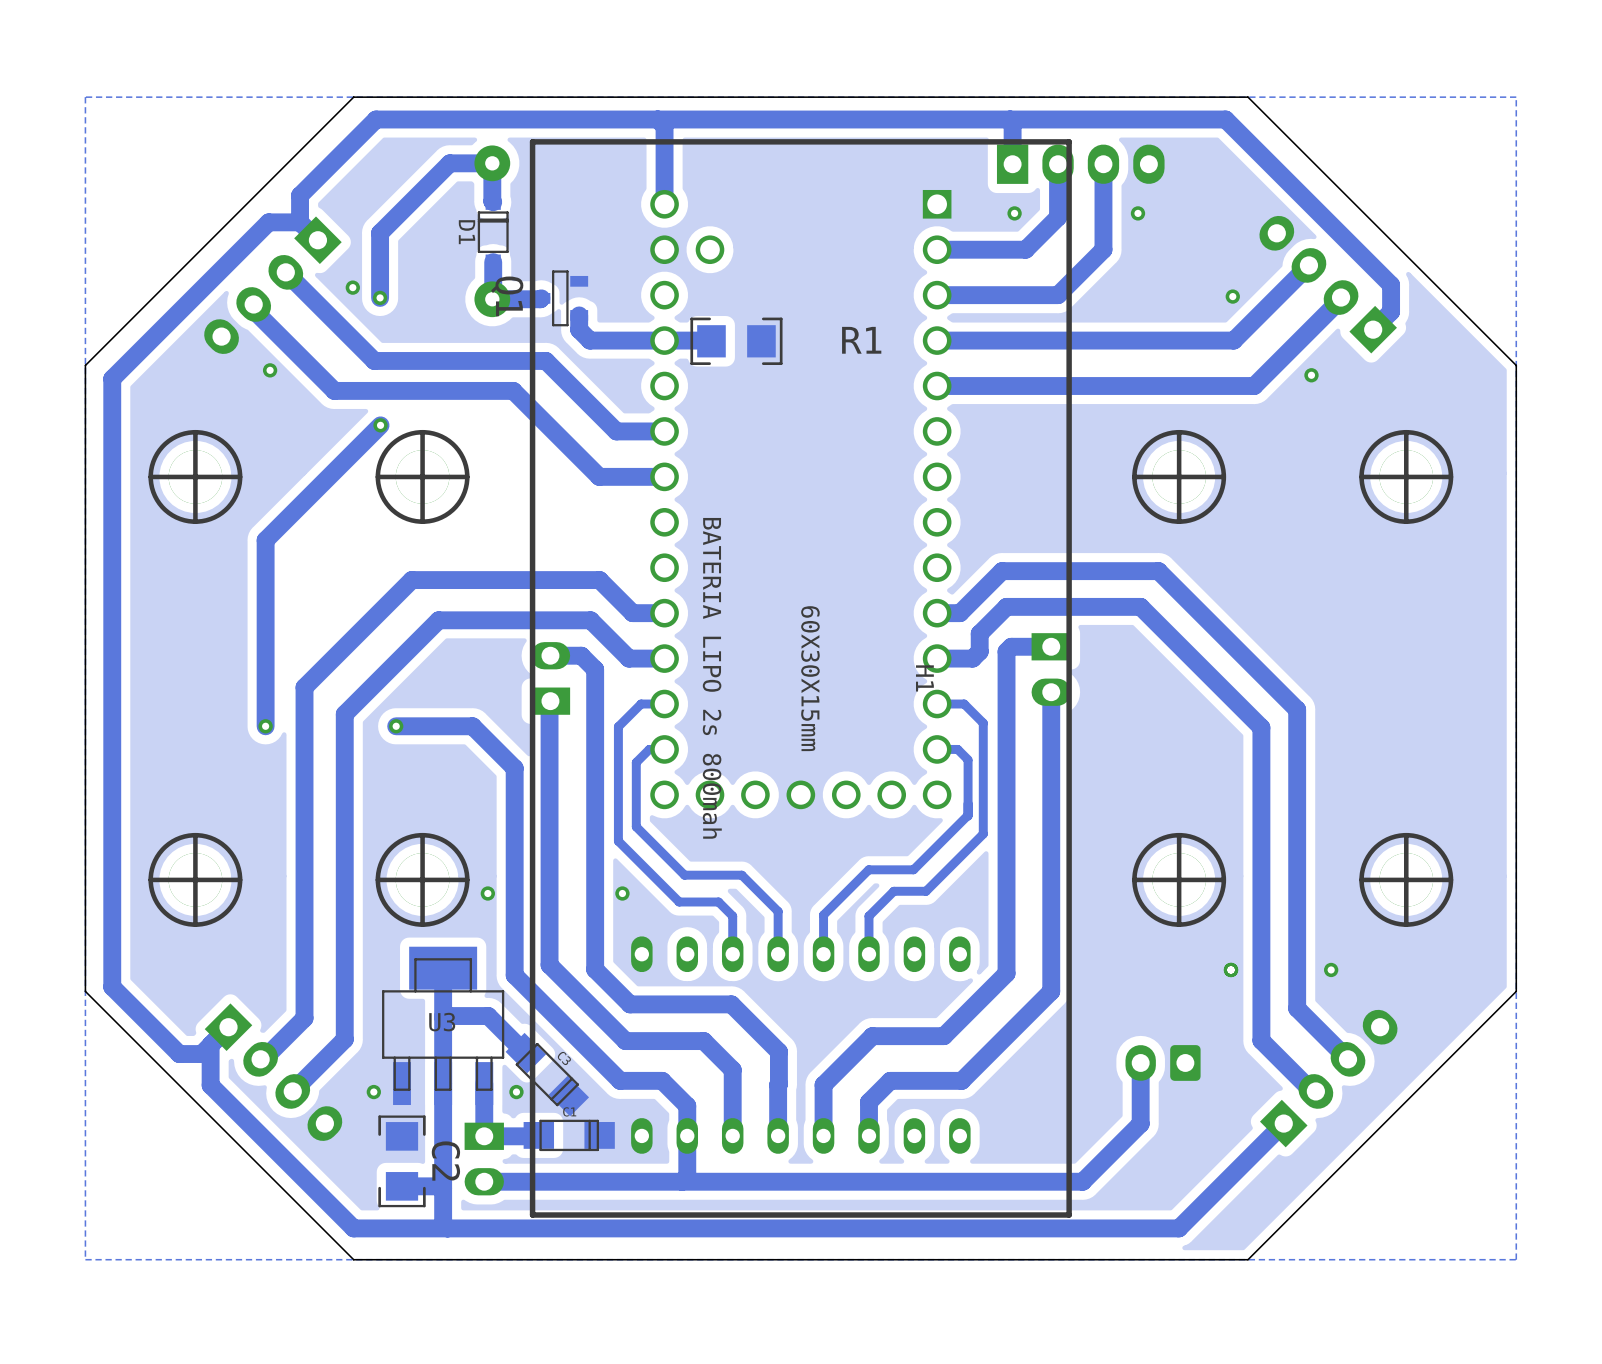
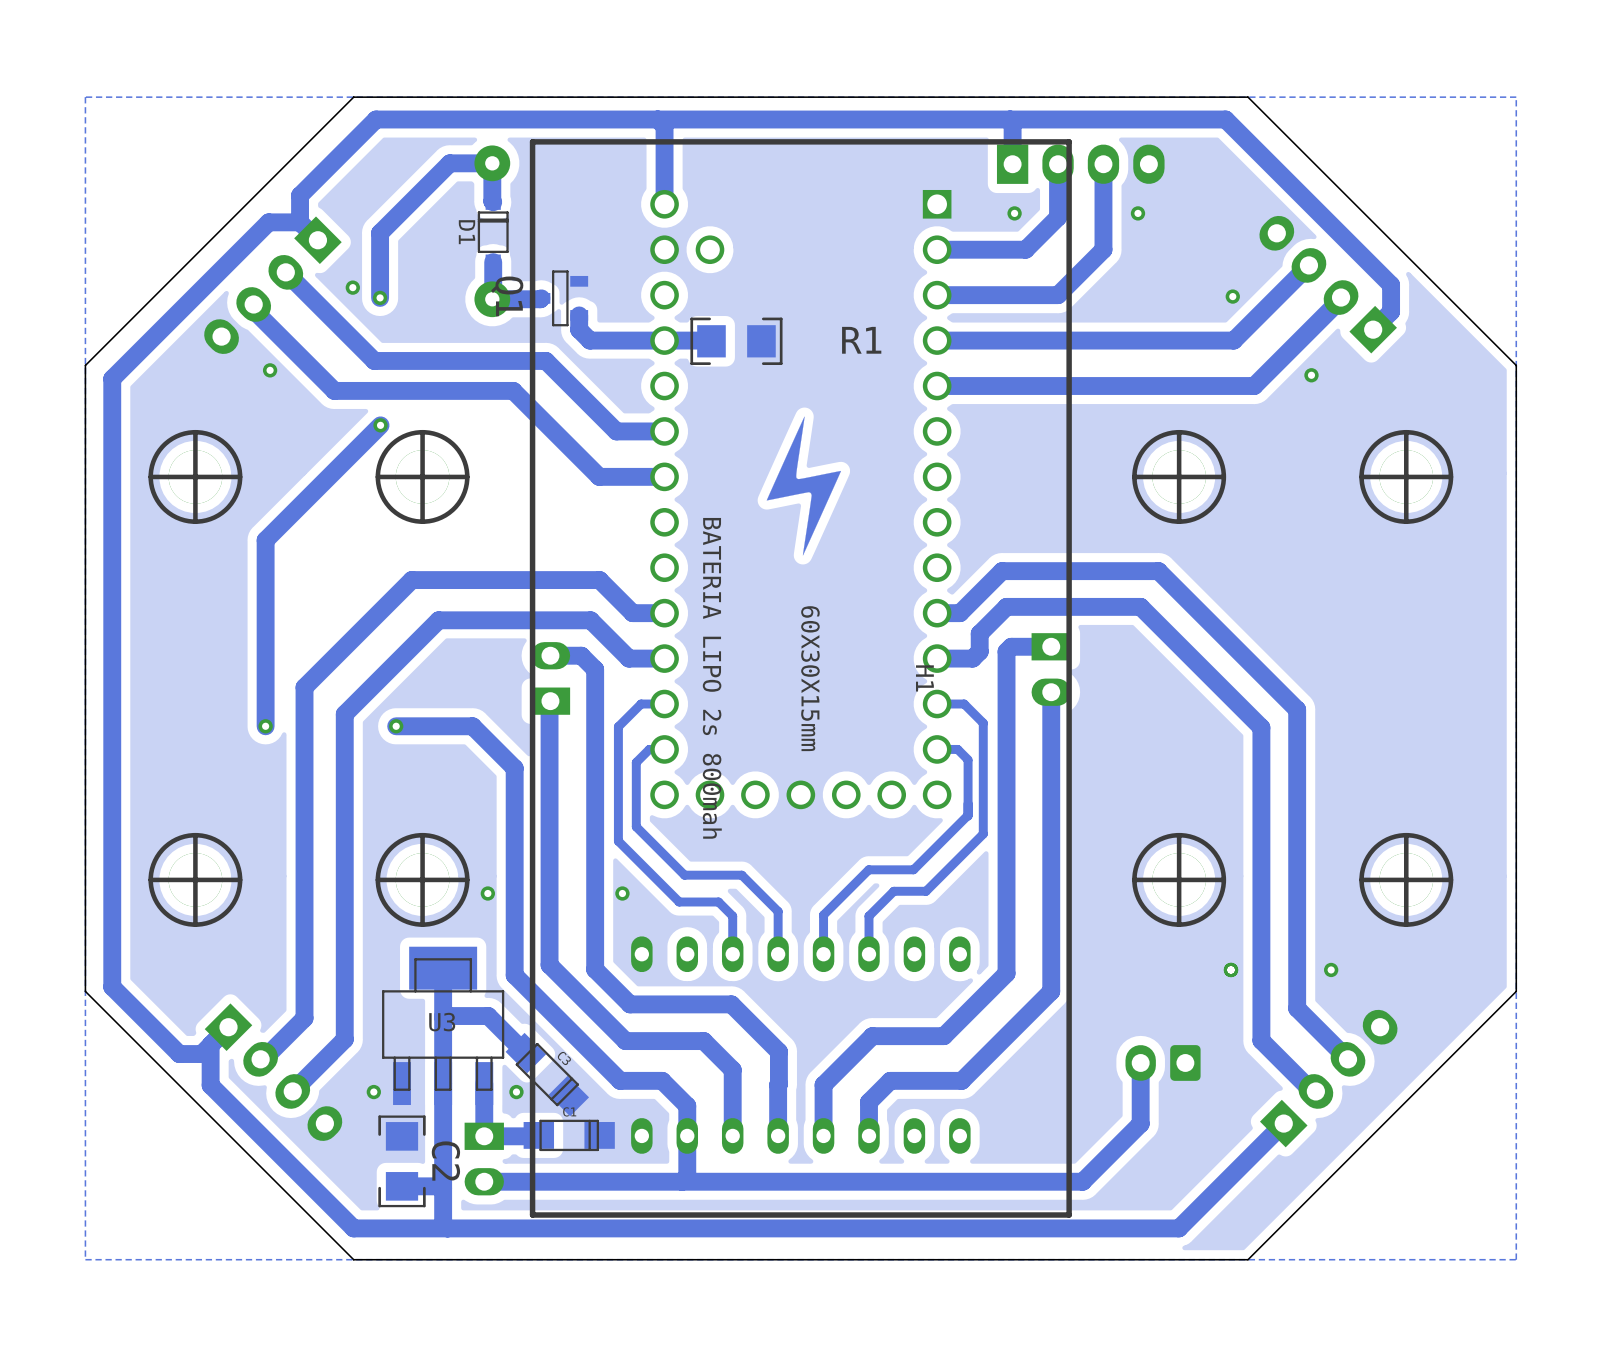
drawing: none -> [766, 416, 842, 556]

